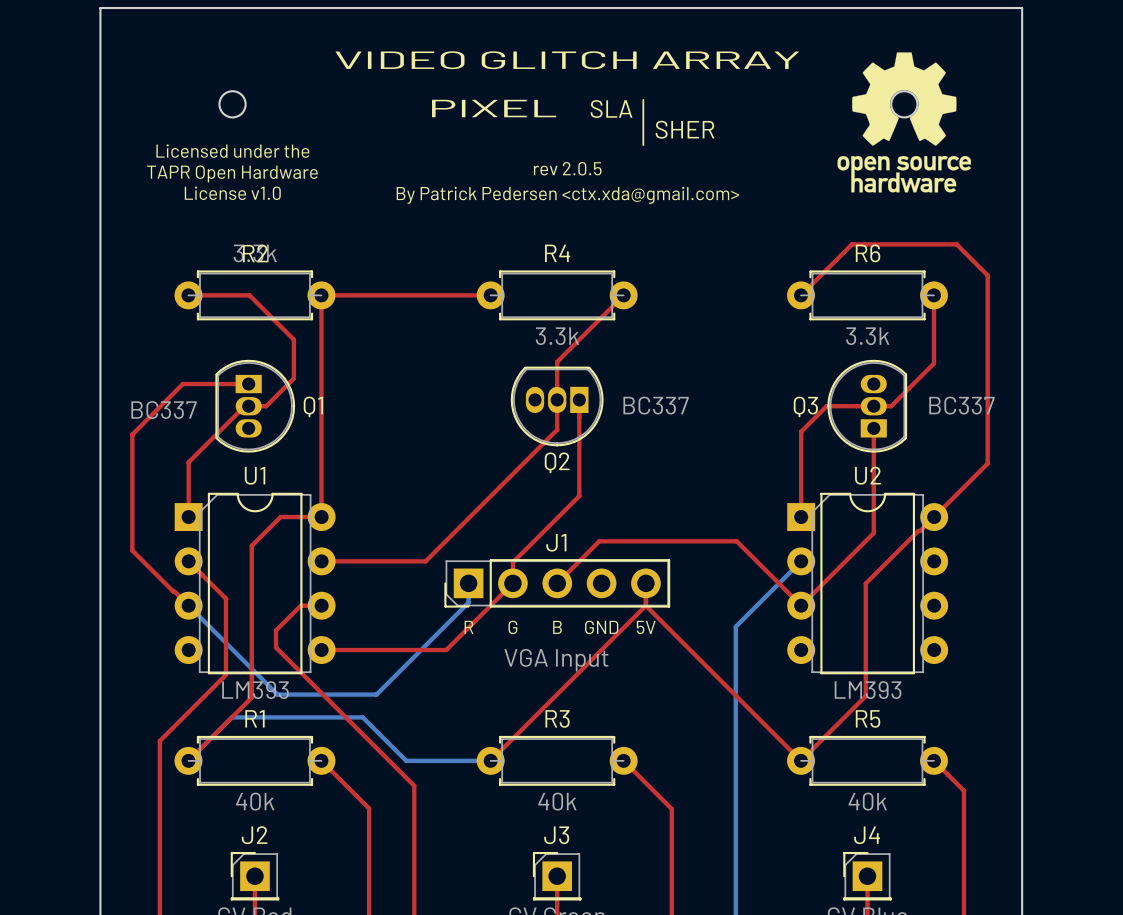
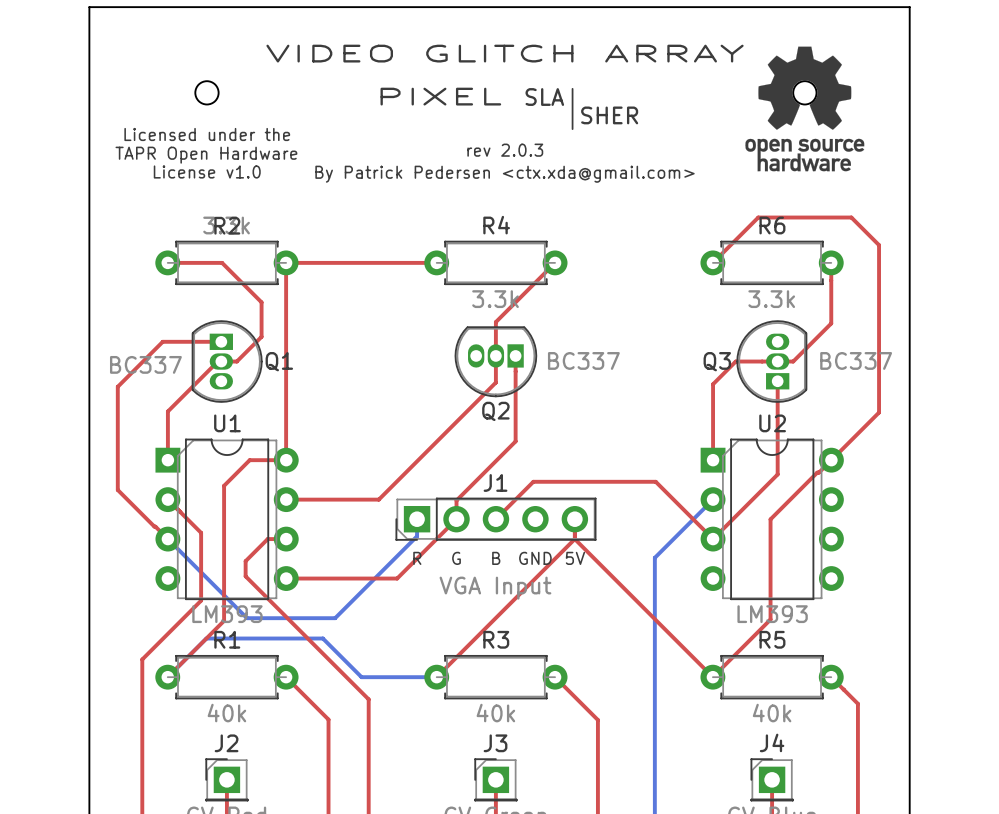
text: rev 2.0.5 (567, 168) -> rev 2.0.3 (505, 150)

